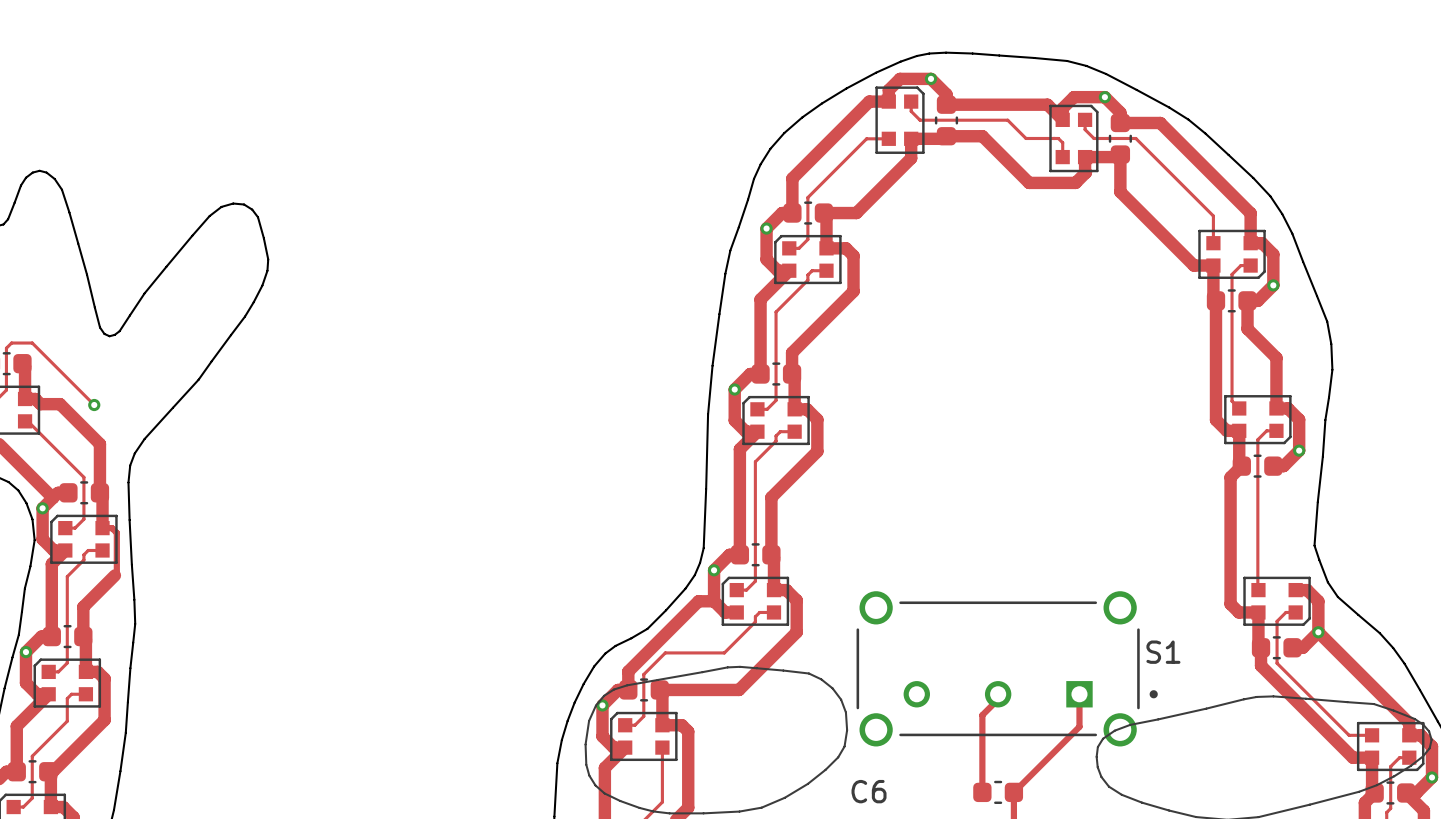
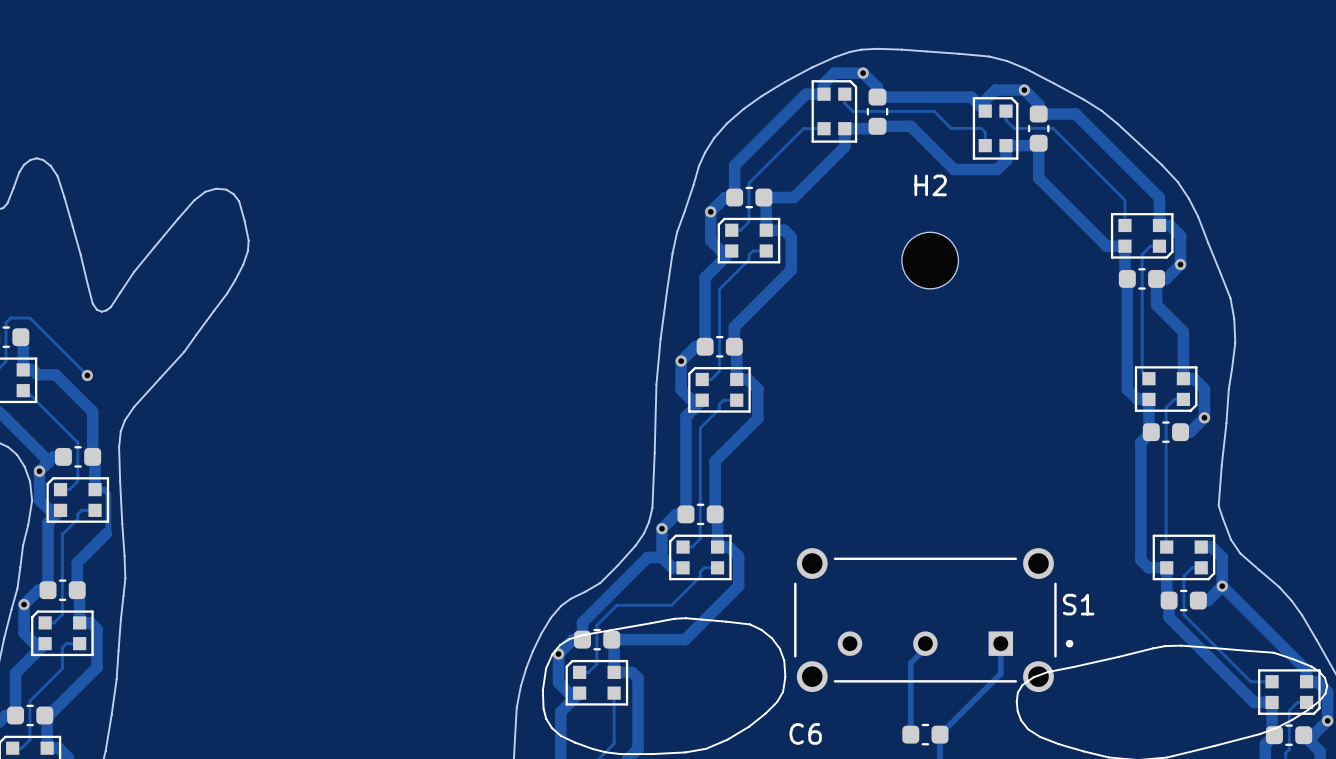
H2: none -> (930, 260)

